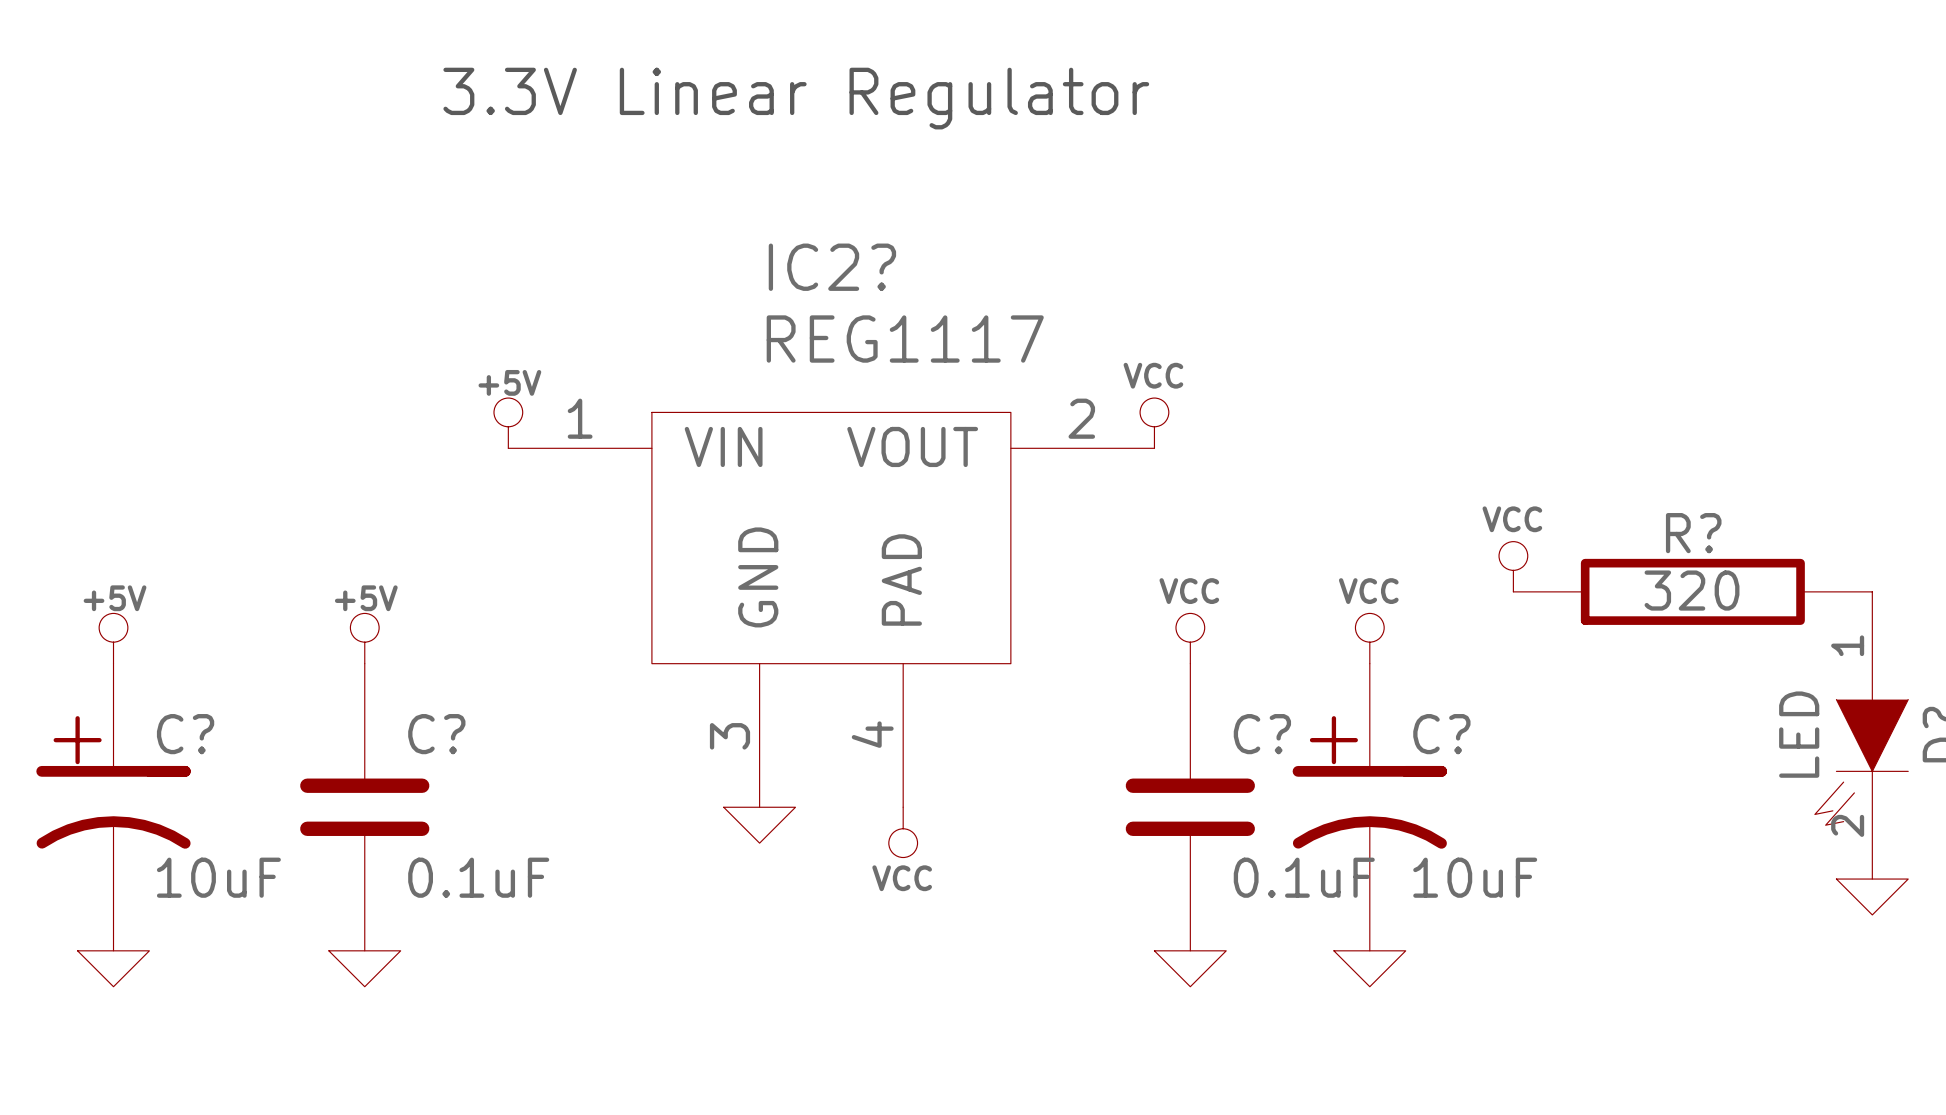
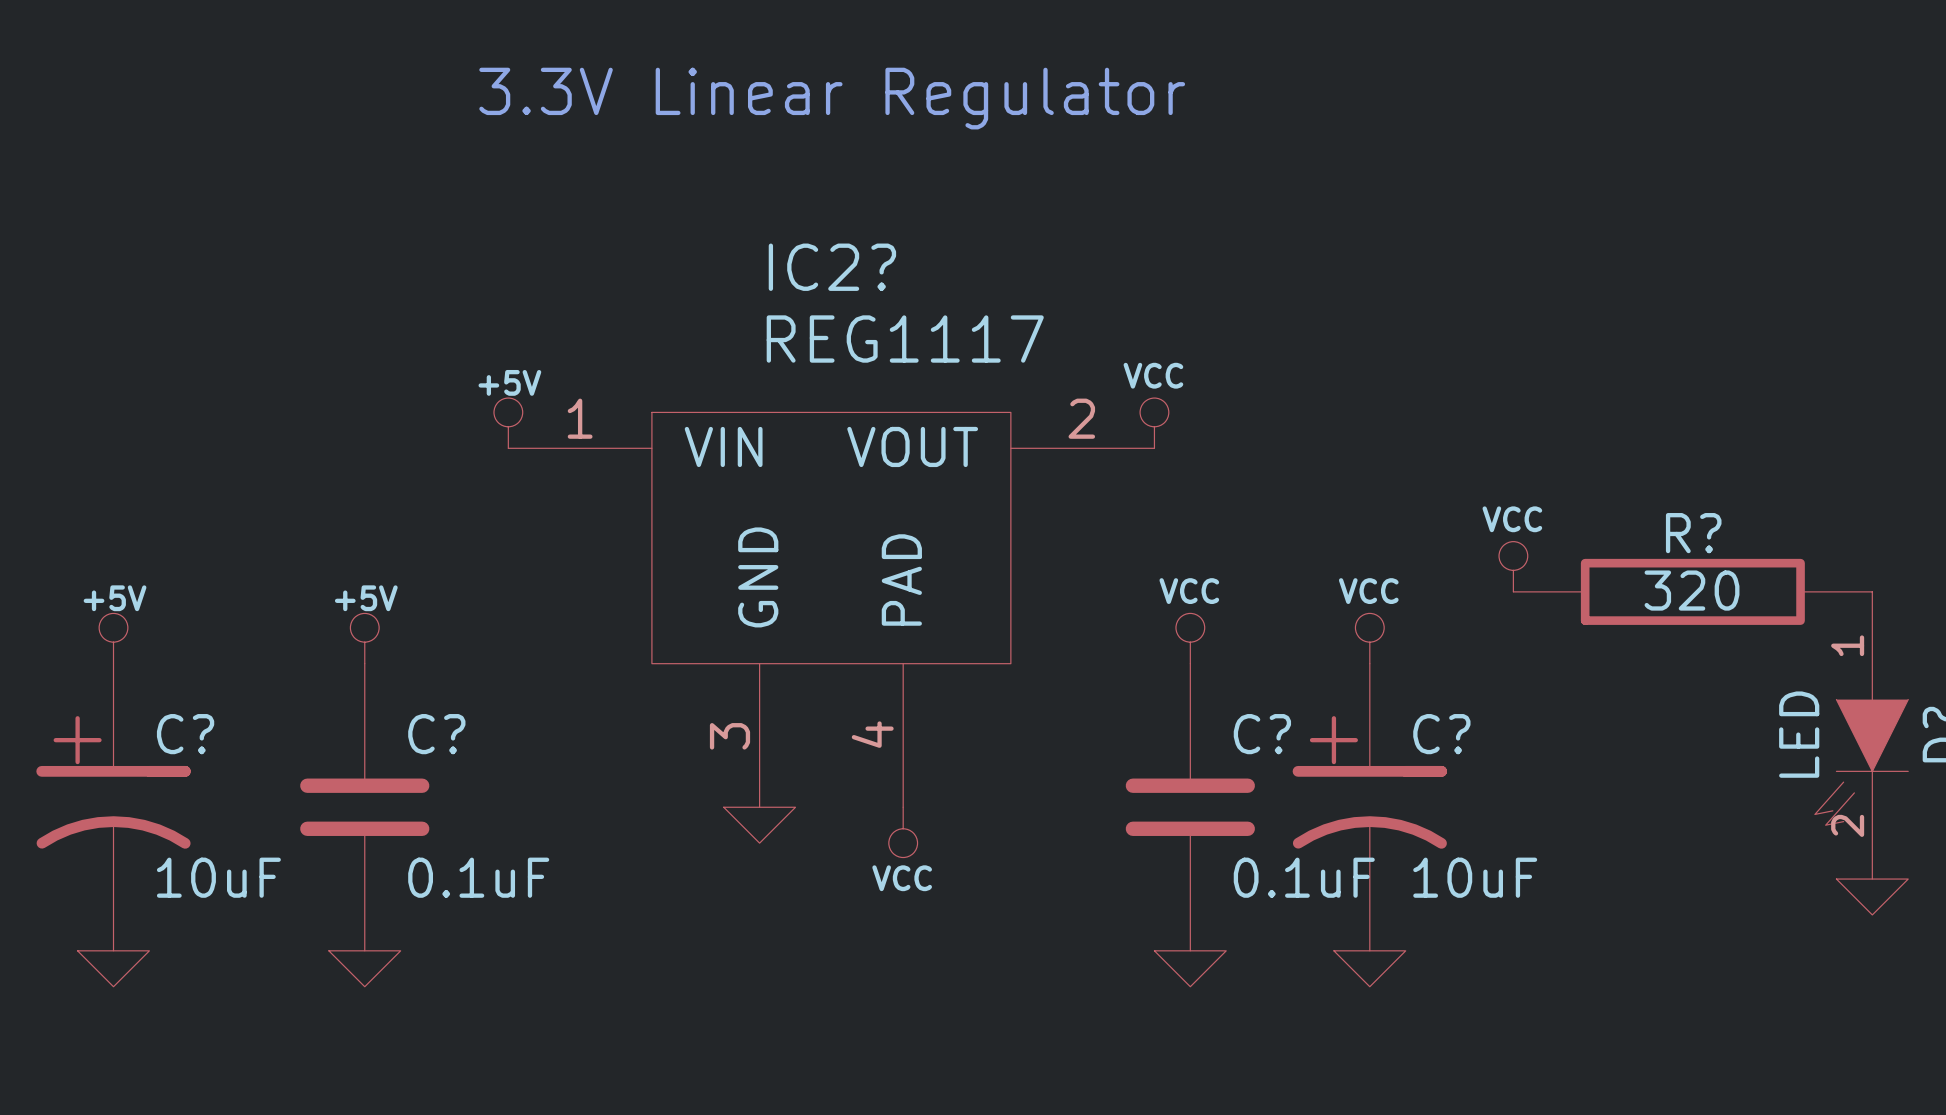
text position: 3.3V Linear Regulator (796, 98) -> 3.3V Linear Regulator (832, 98)

